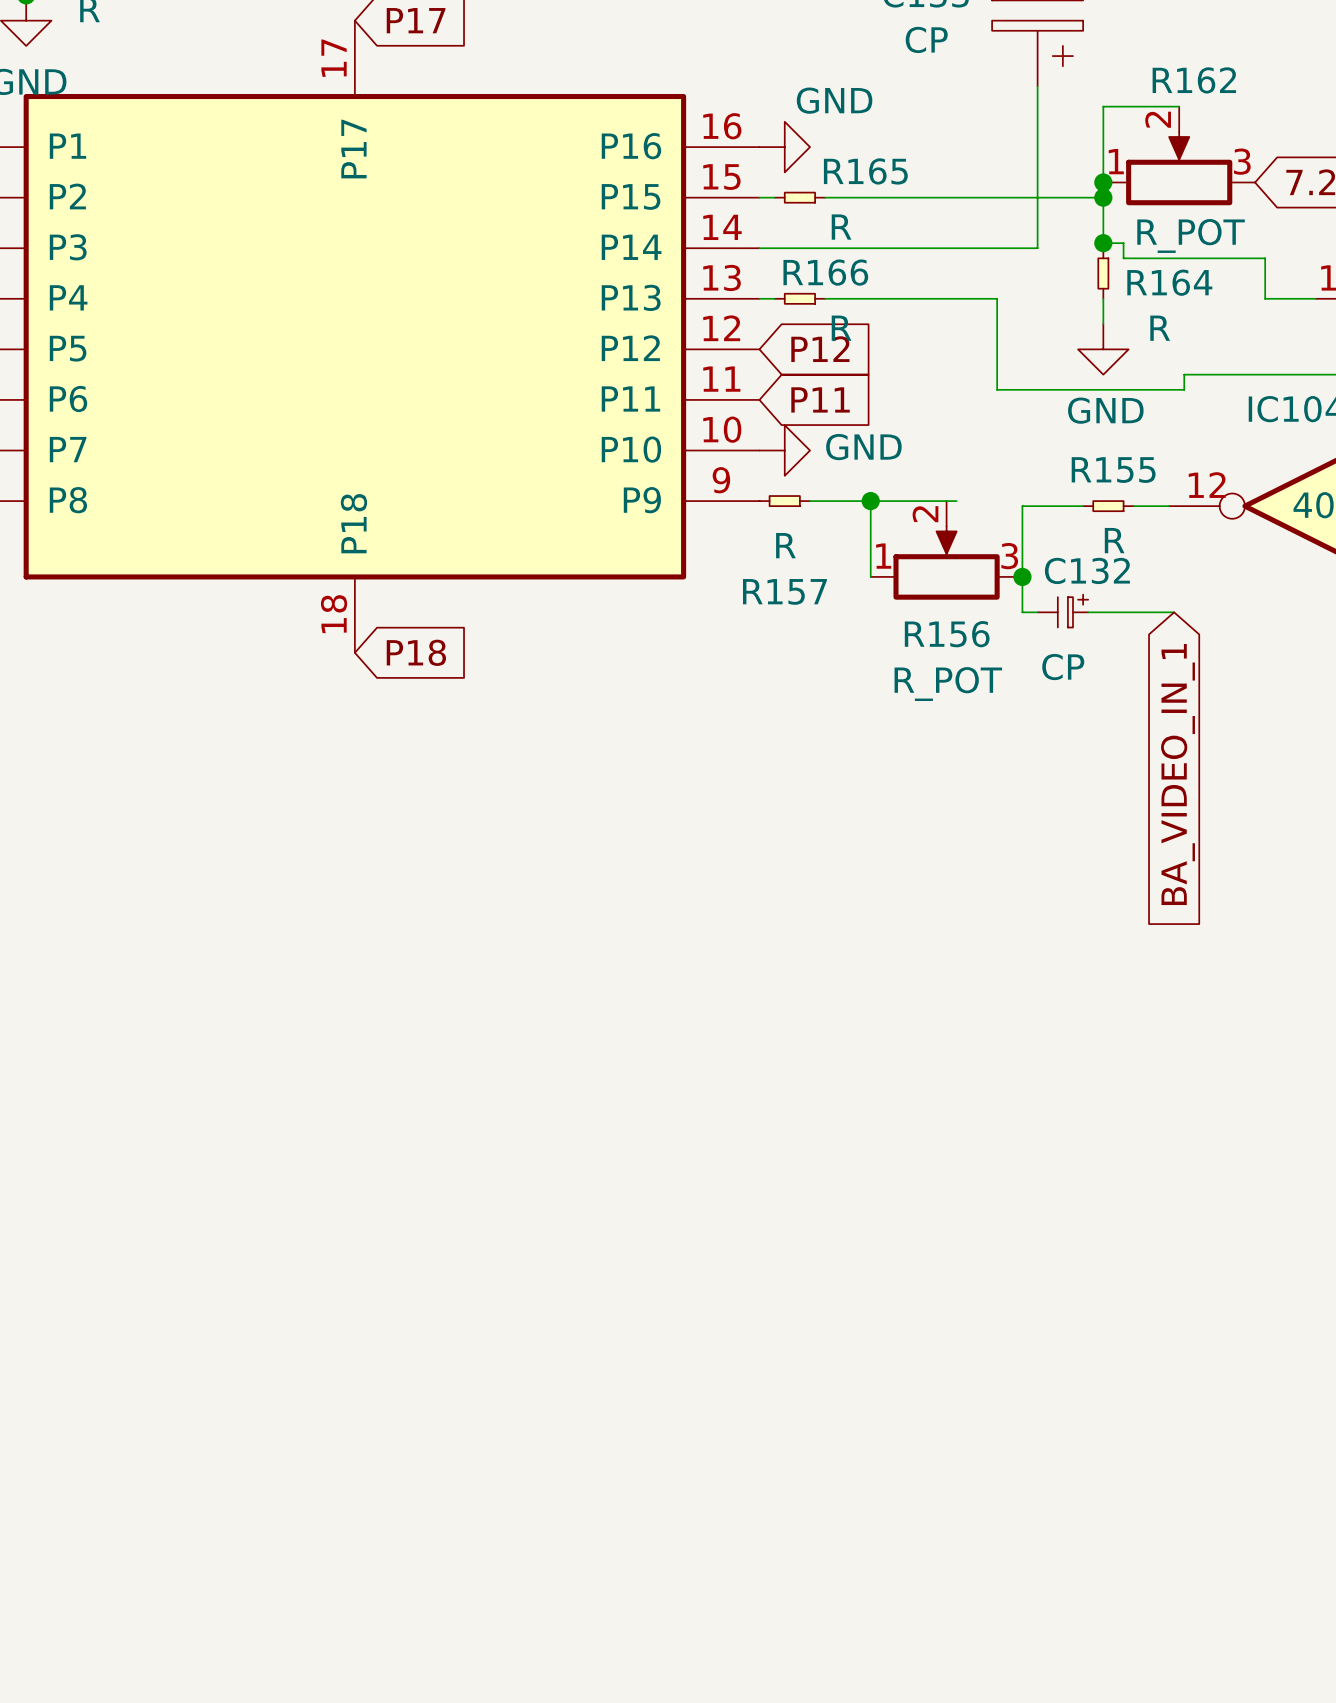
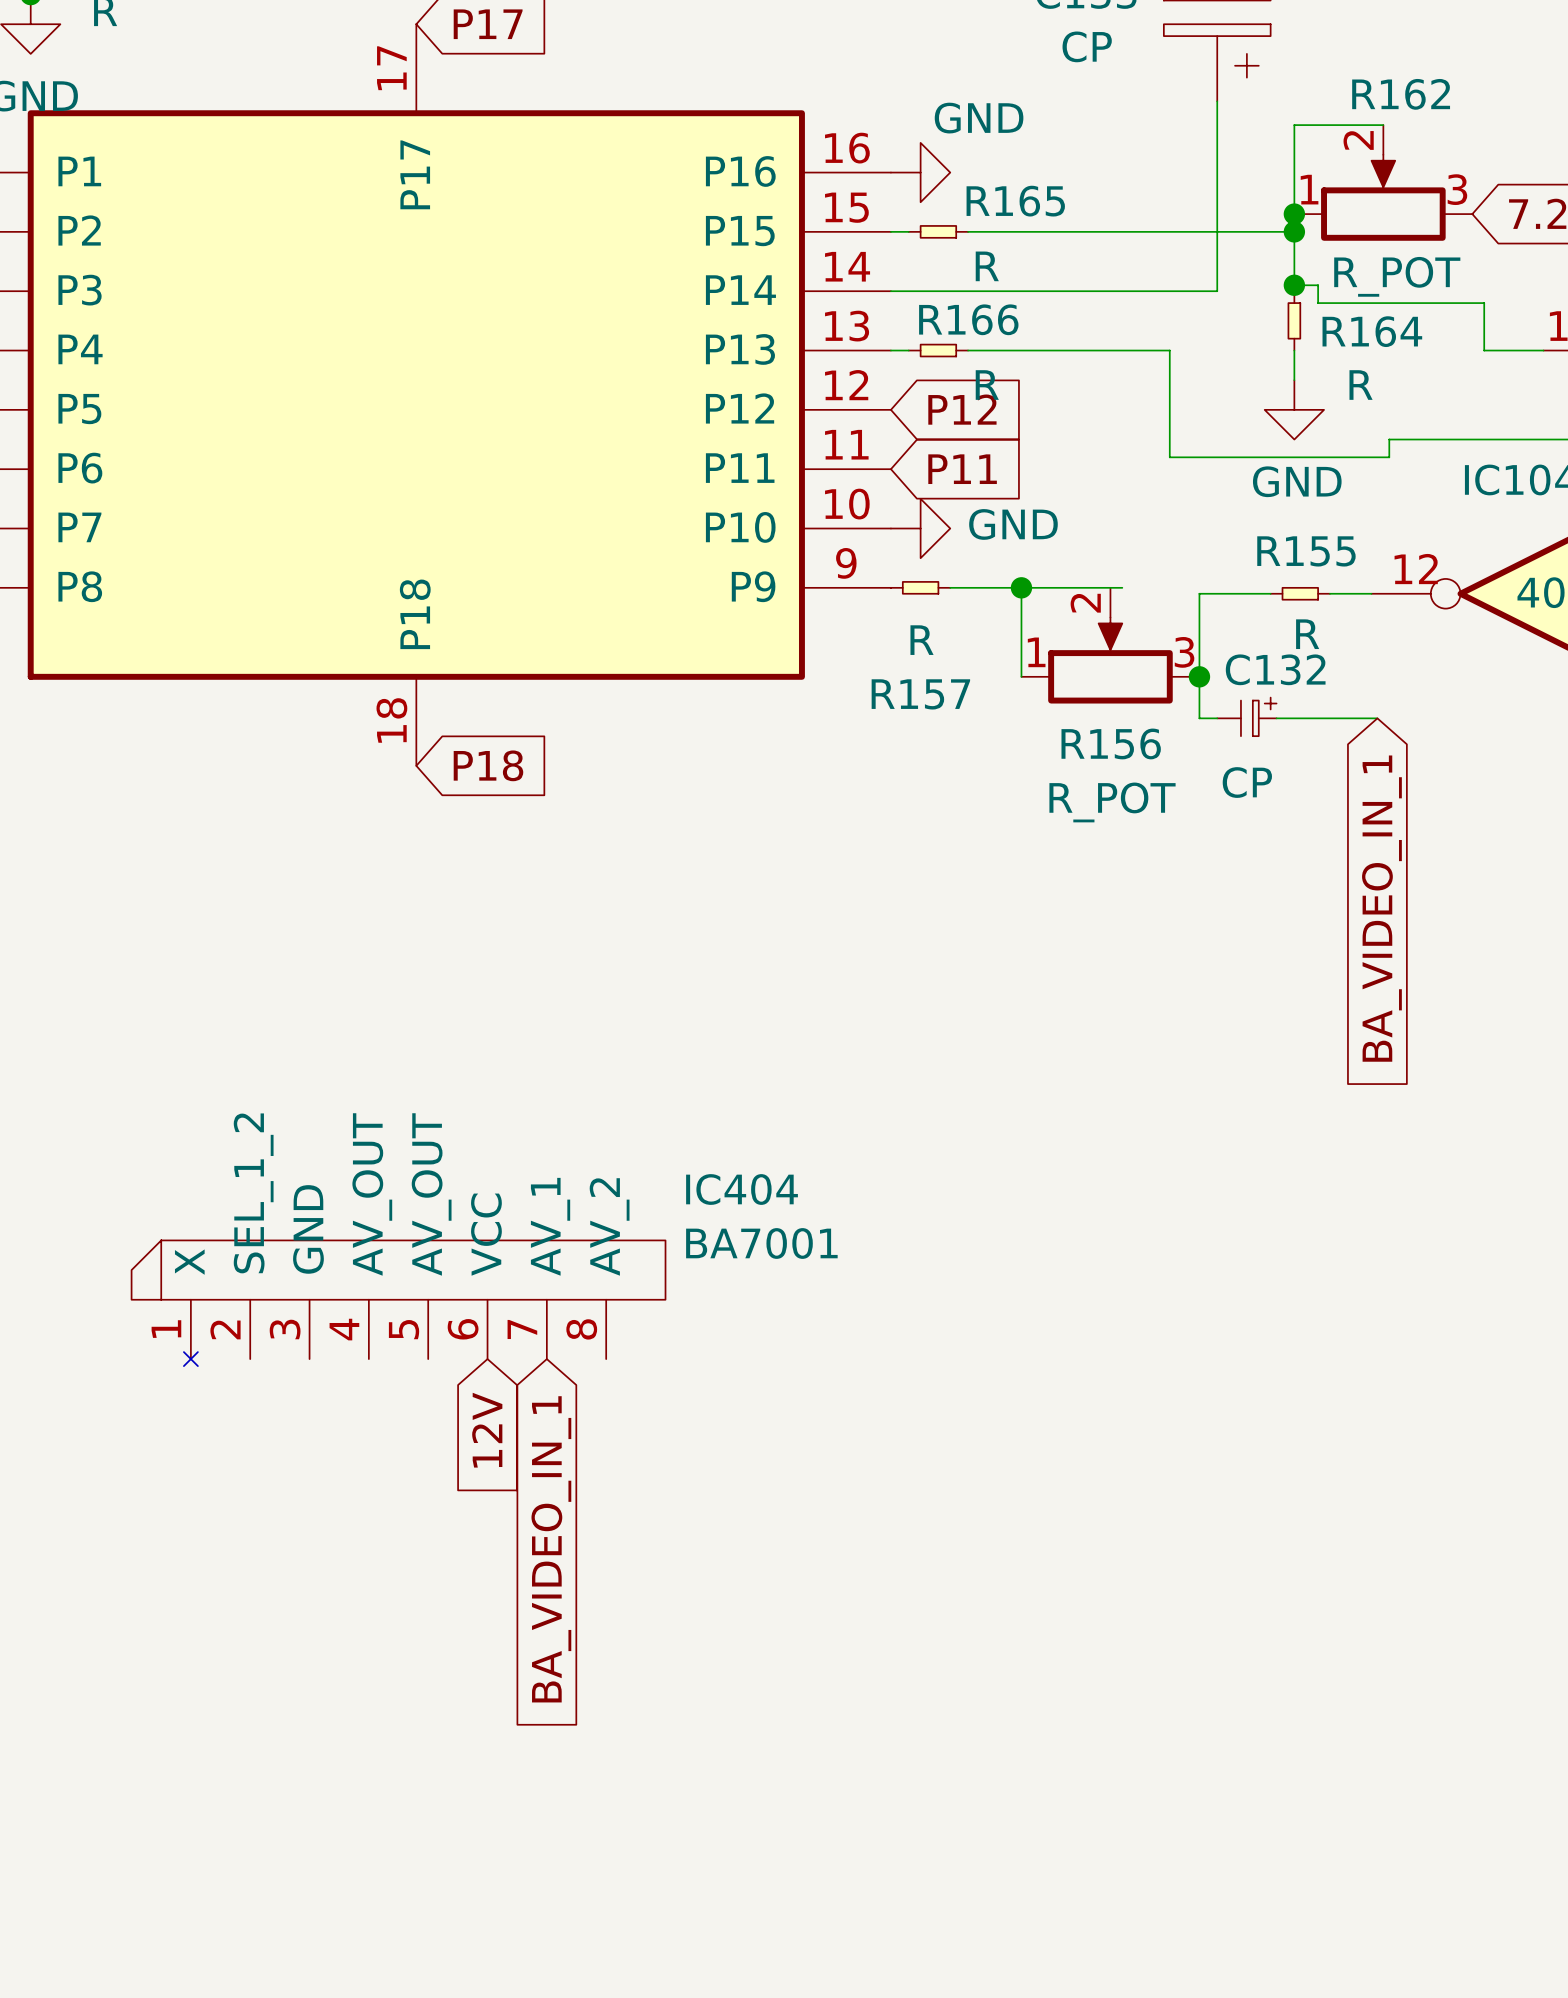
IC404: none -> BA7001 (398, 1303)
global label: none -> 12V (487, 1430)
global label: none -> BA_VIDEO_IN_1 (551, 1549)

